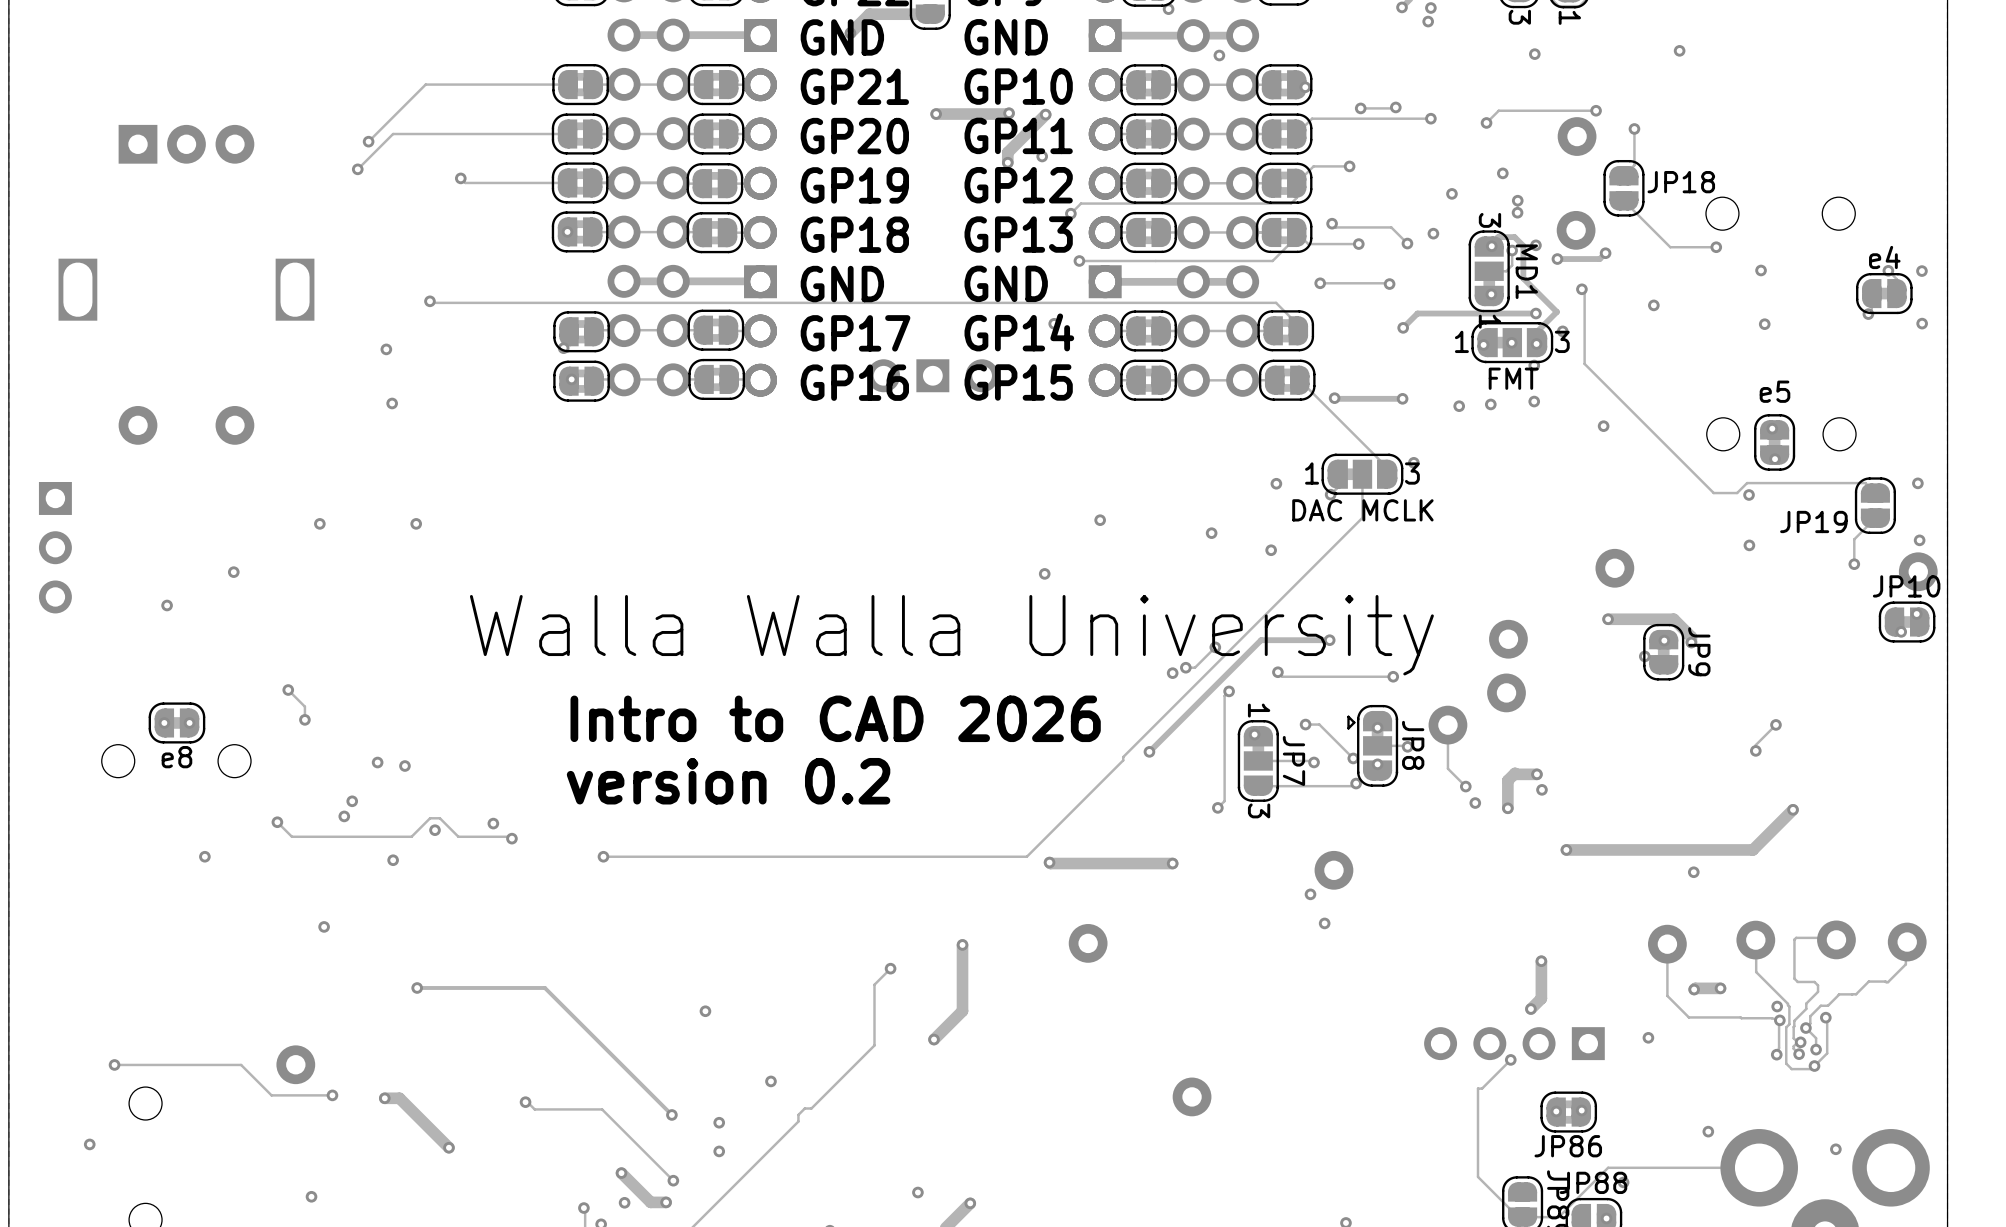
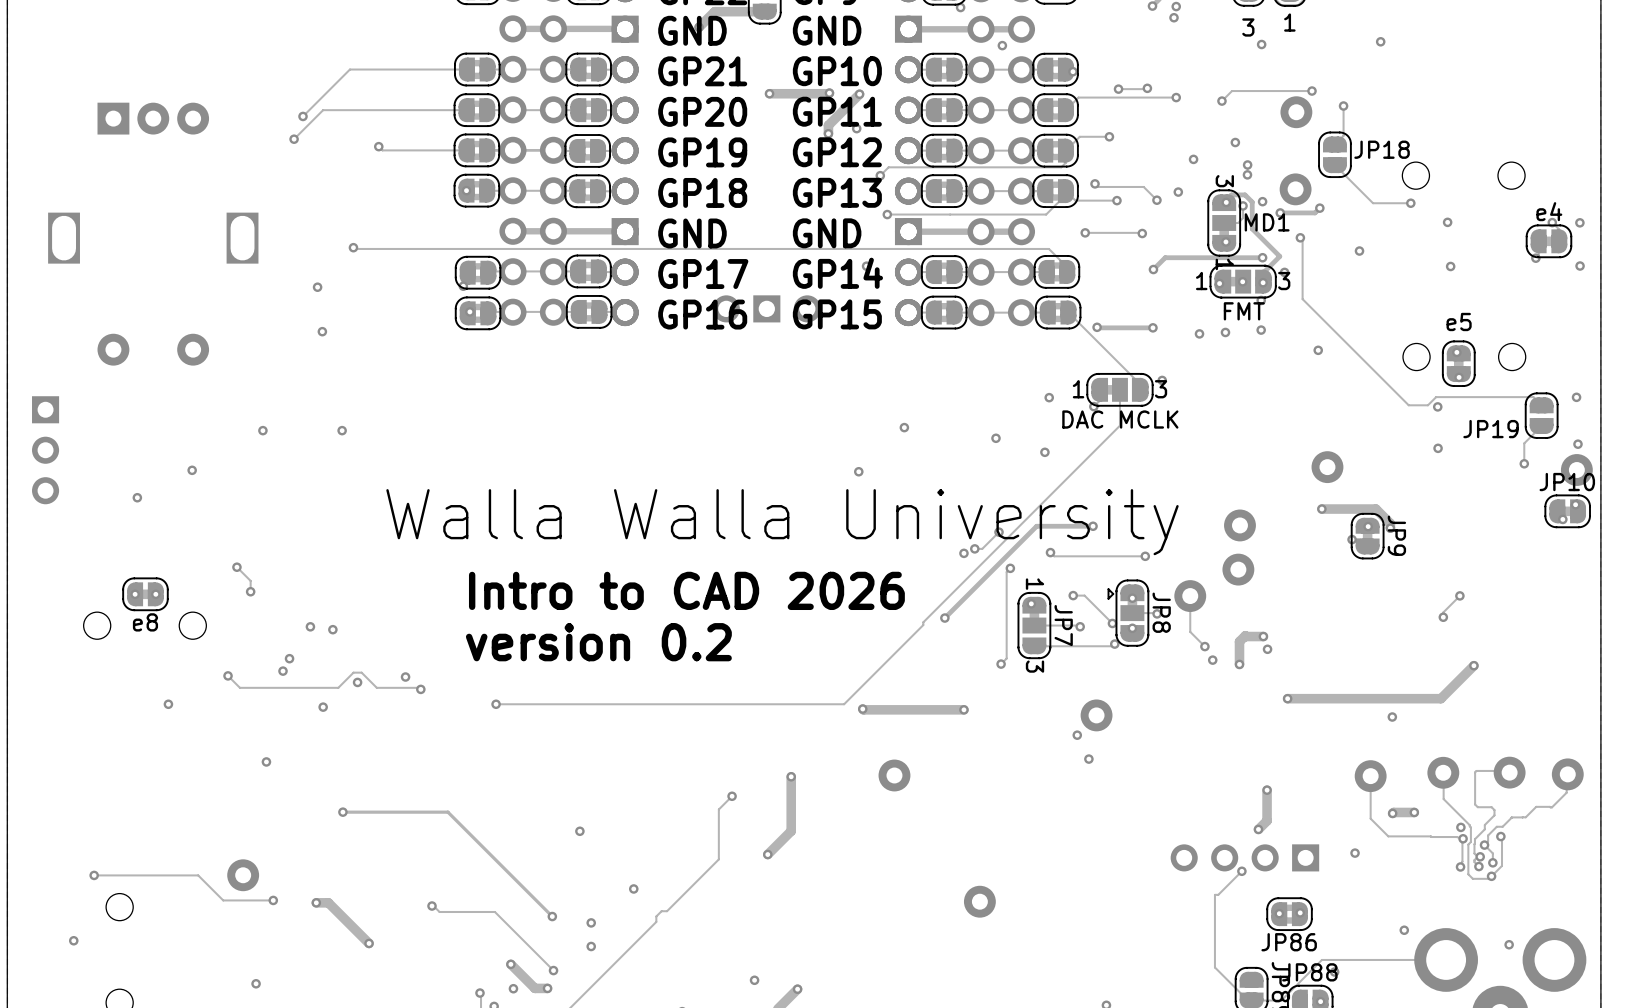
part text rotation: 0° (1519, 17) -> 90° counterclockwise (1248, 27)
part text rotation: 0° (1569, 17) -> 90° counterclockwise (1289, 22)
part value rotation: 0° (1526, 271) -> 90° counterclockwise (1267, 222)

